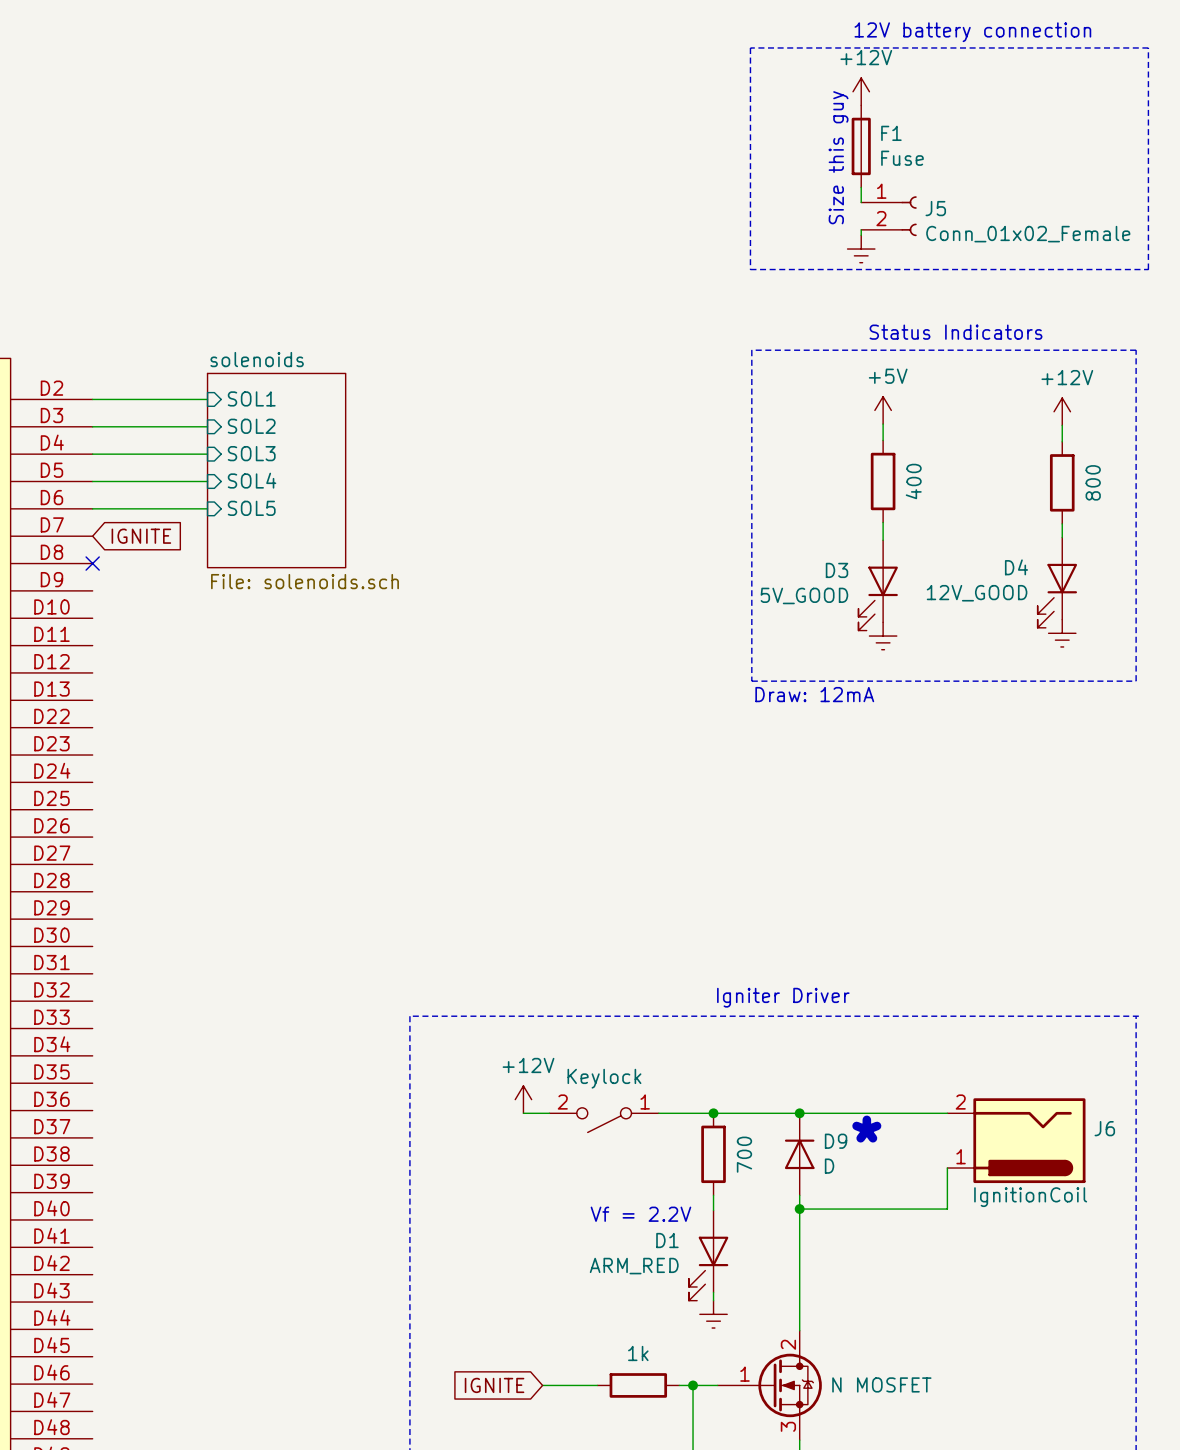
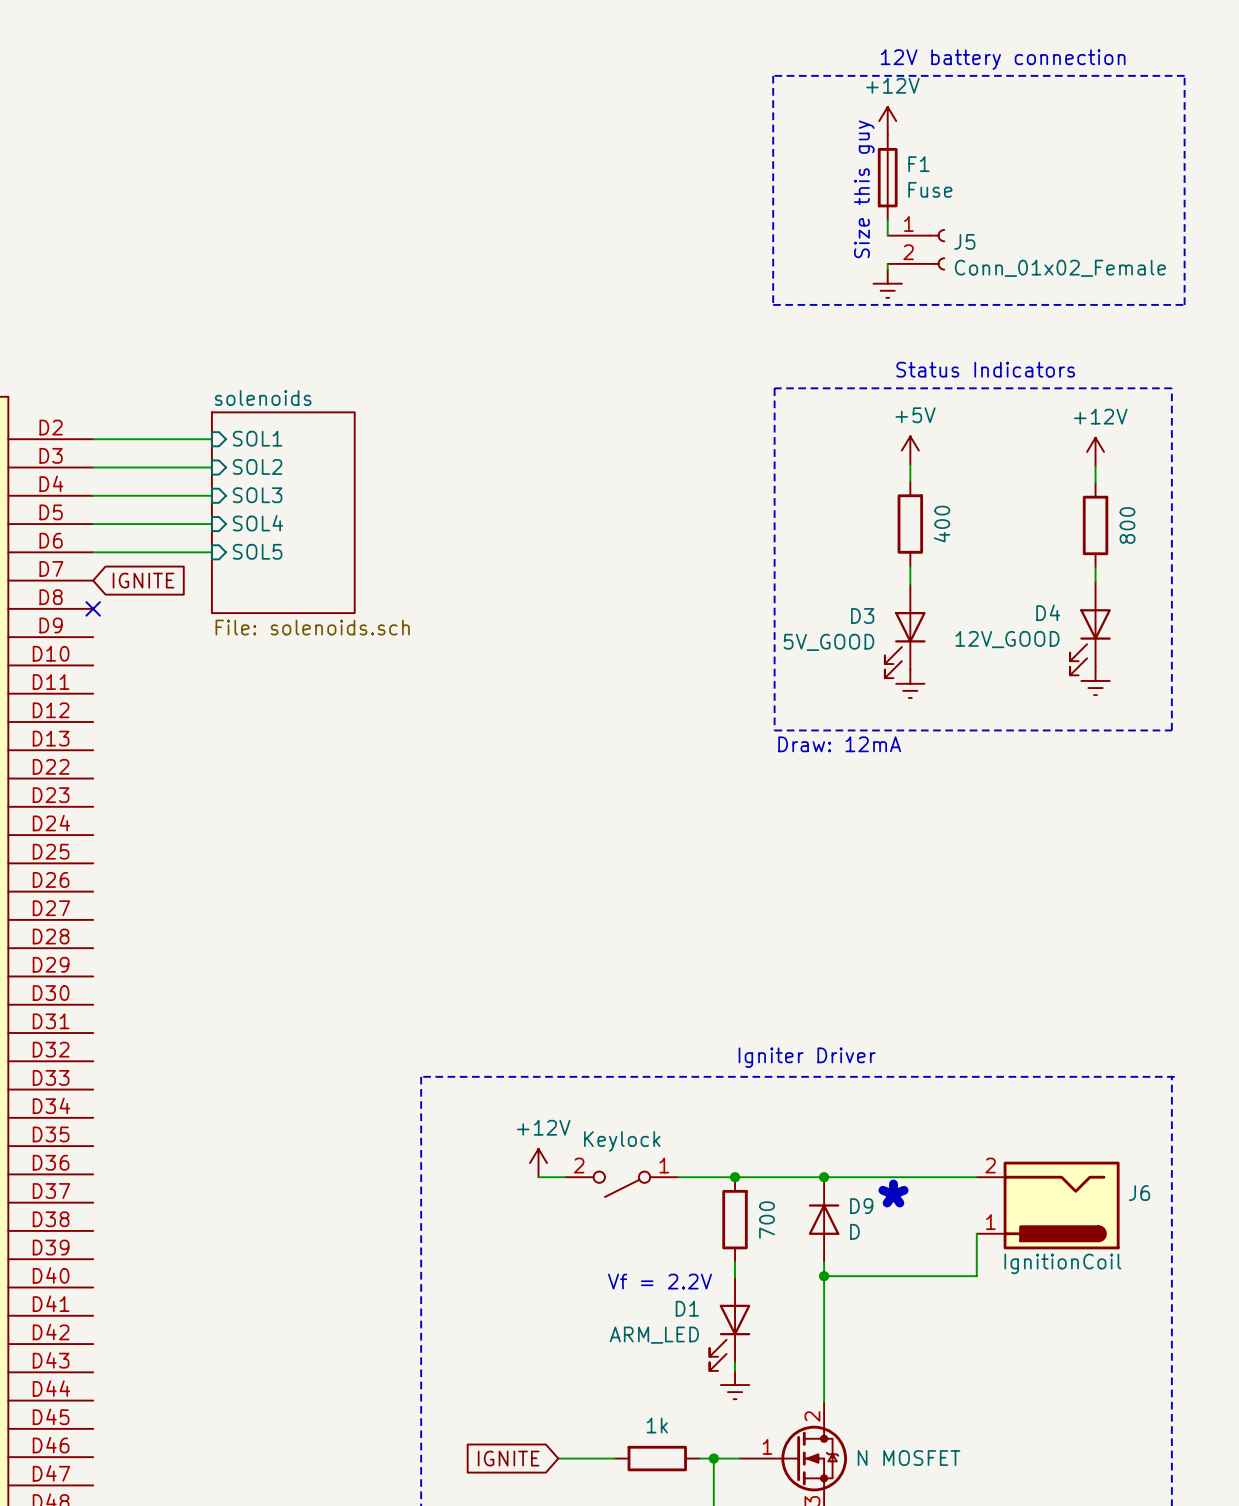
D1 value: ARM_RED (634, 1266) -> ARM_LED (654, 1335)

